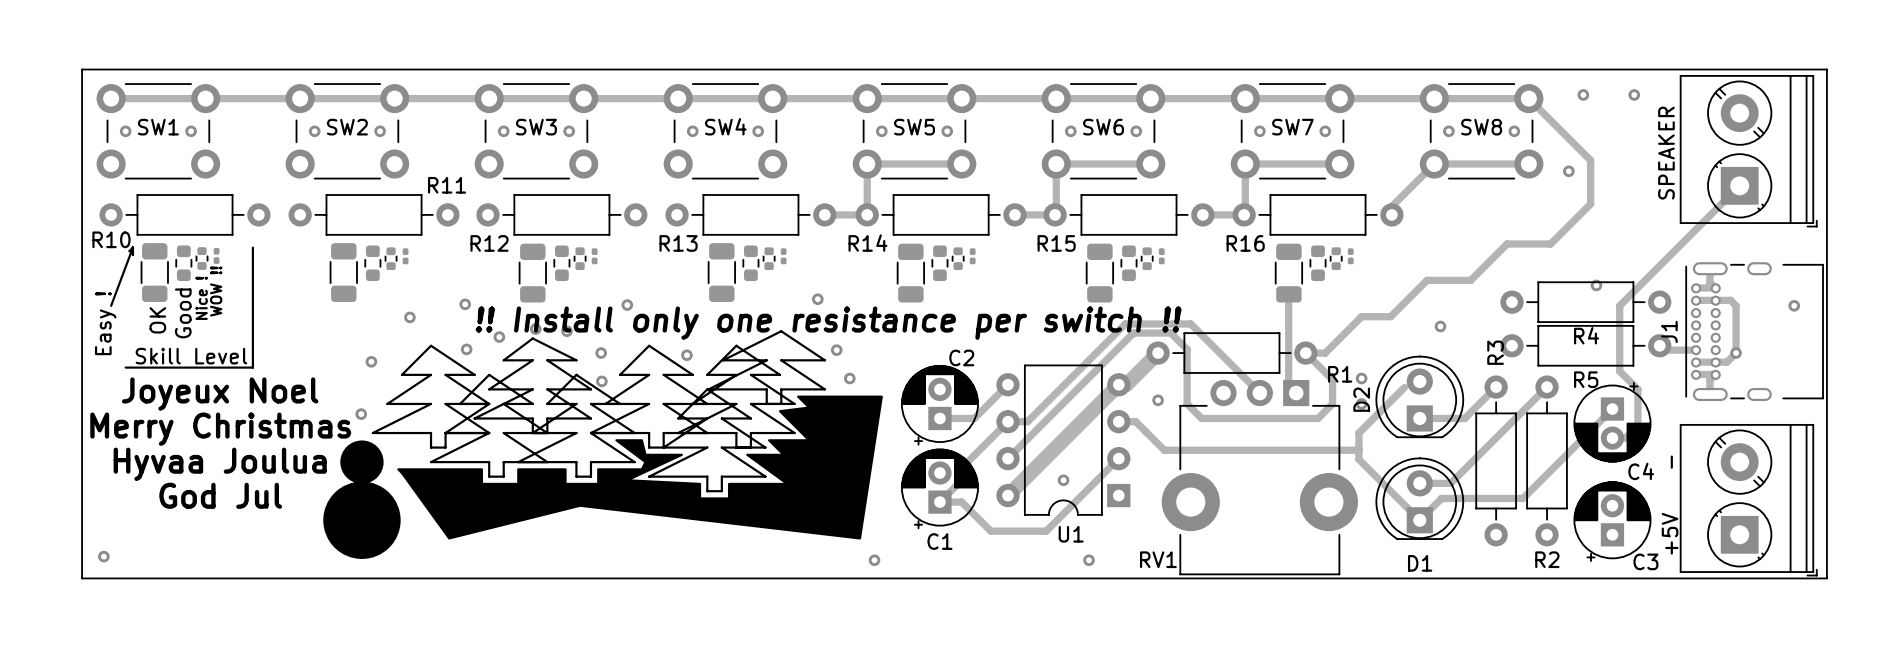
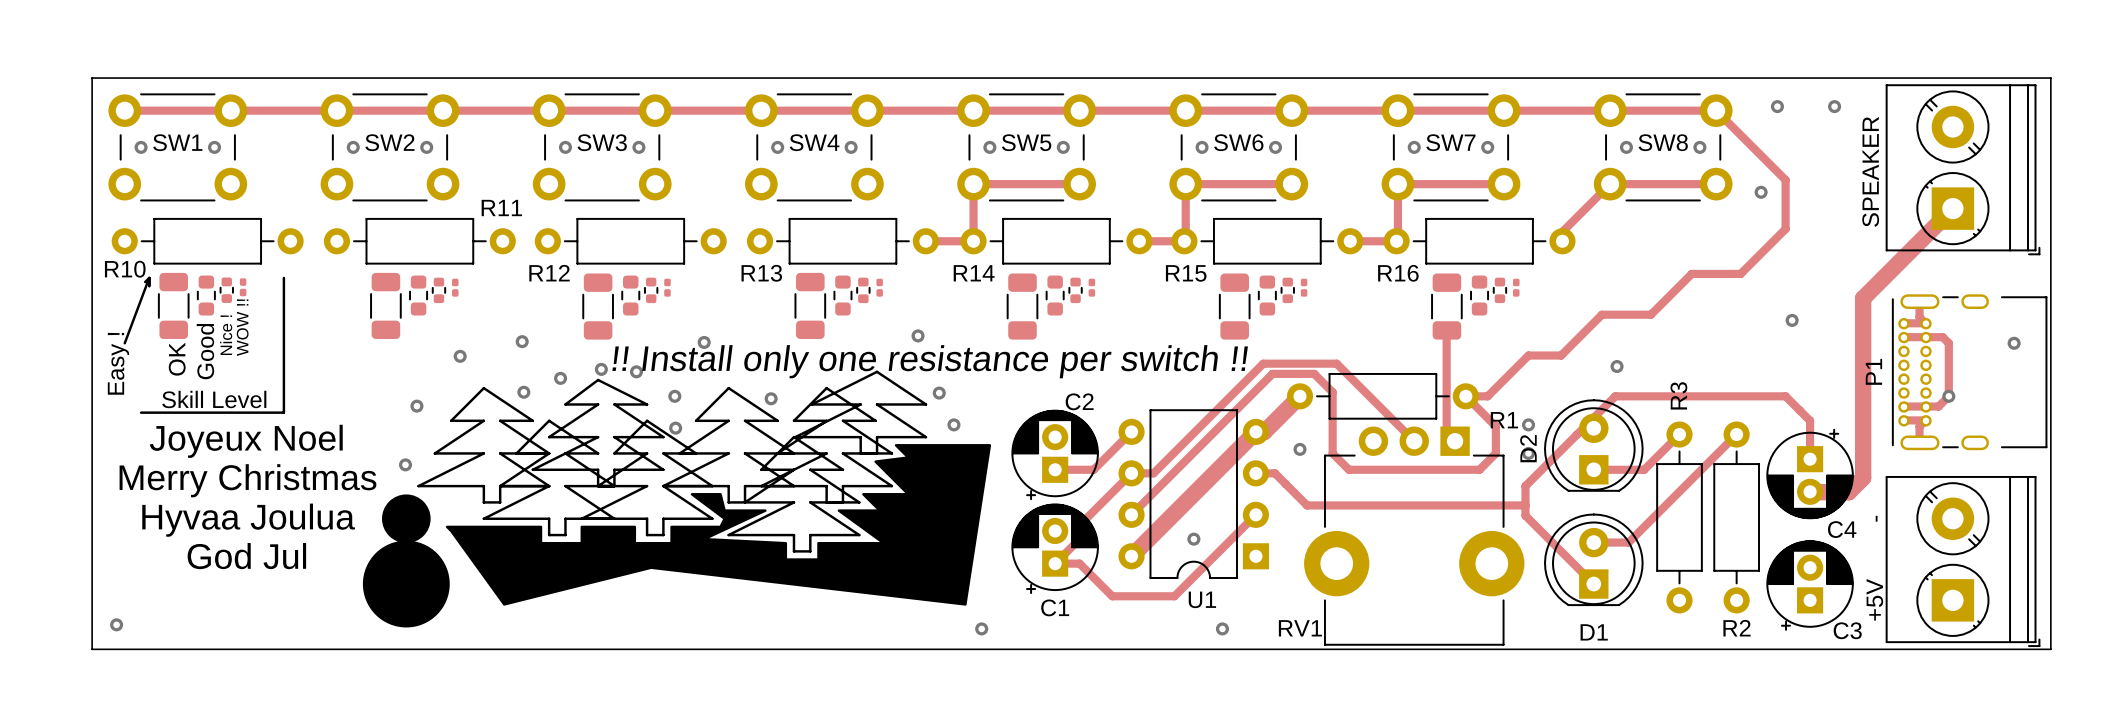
track width: thin (1739, 185) (1659, 265) -> thick (1952, 208) (1863, 298)
track: (1659, 265) (1619, 305) (1619, 371) (1637, 389) (1637, 425) (1625, 438) (1612, 438) -> (1863, 298) (1863, 477) (1848, 492) (1810, 492)
R4: (1585, 302) -> none
J1 name: J1 (1669, 331) -> P1 (1873, 371)
R5: (1585, 345) -> none
track: (1659, 345) (1664, 350) (1696, 350) -> none
track: (1612, 409) (1523, 498) (1441, 498) (1419, 520) -> (1810, 459) (1810, 420) (1785, 396) (1615, 396) (1576, 435)

